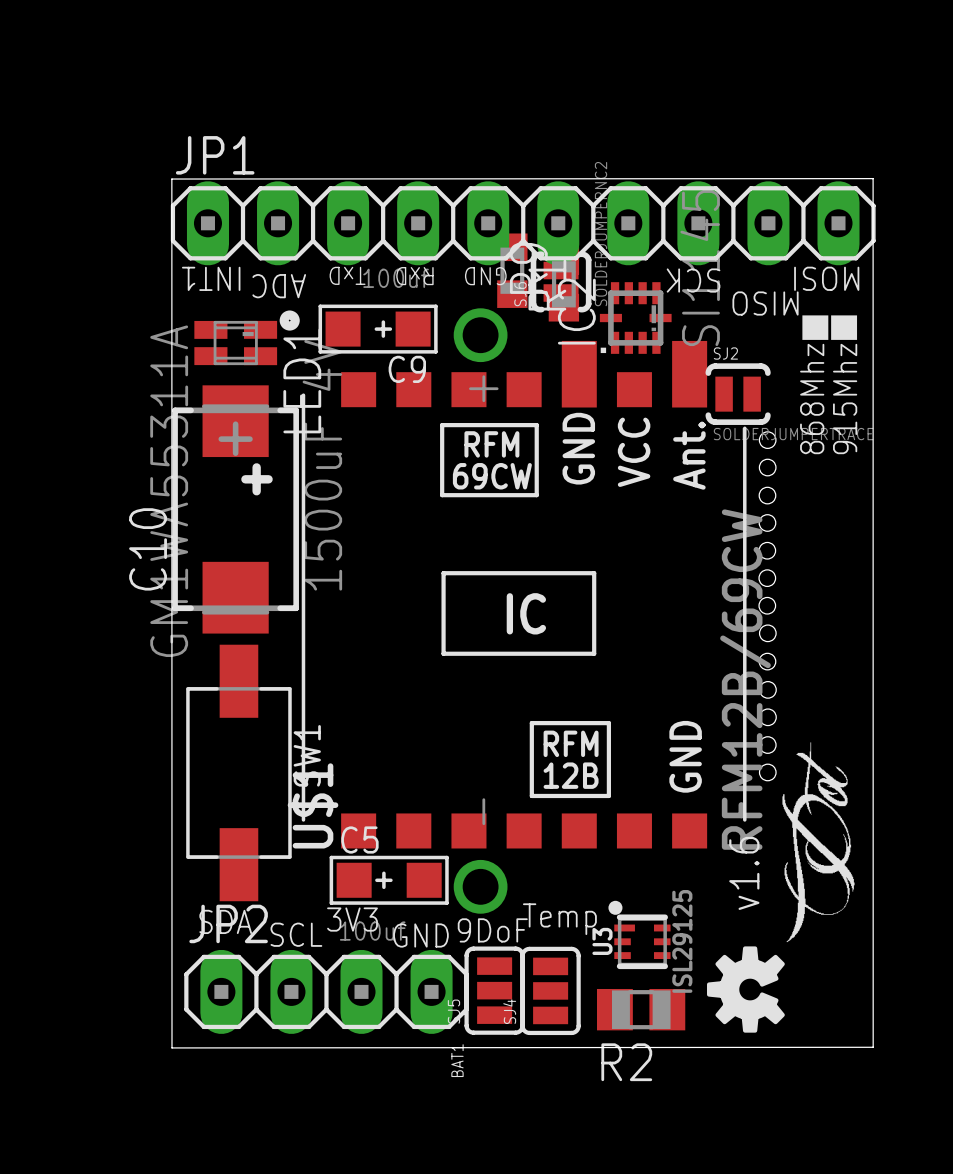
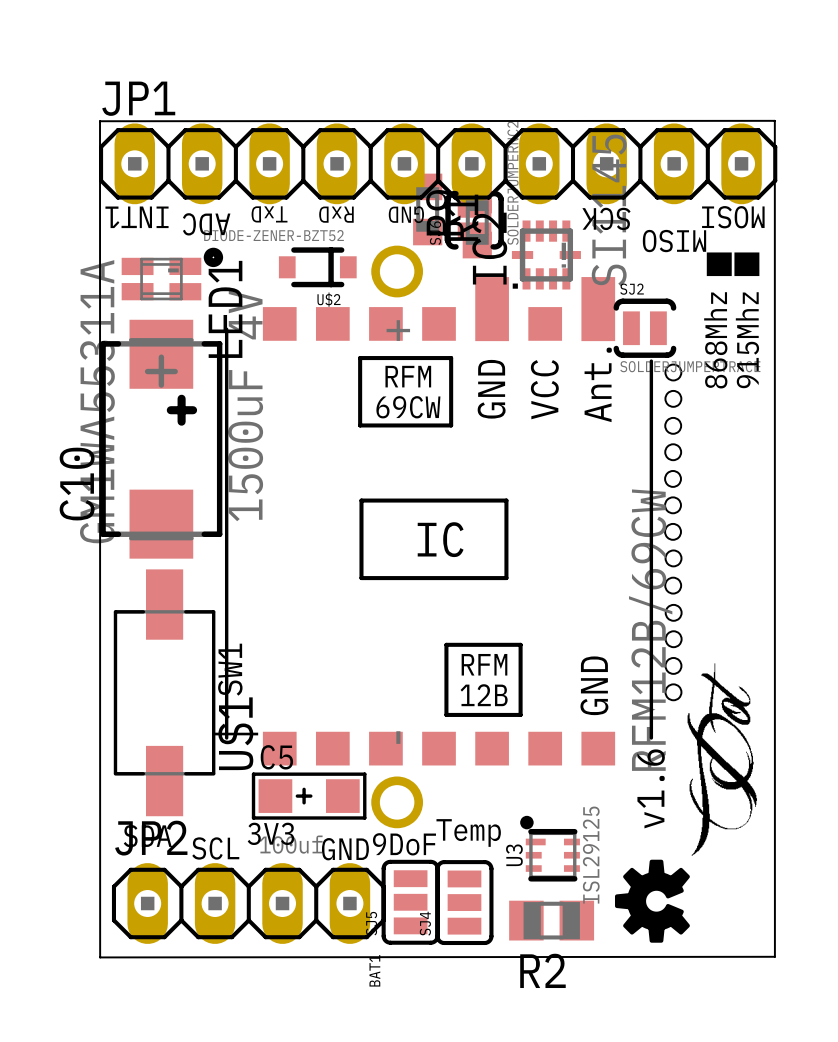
C9: 100uf (378, 329) -> none
U$2: none -> DIODE-ZENER-BZT52 (317, 267)

